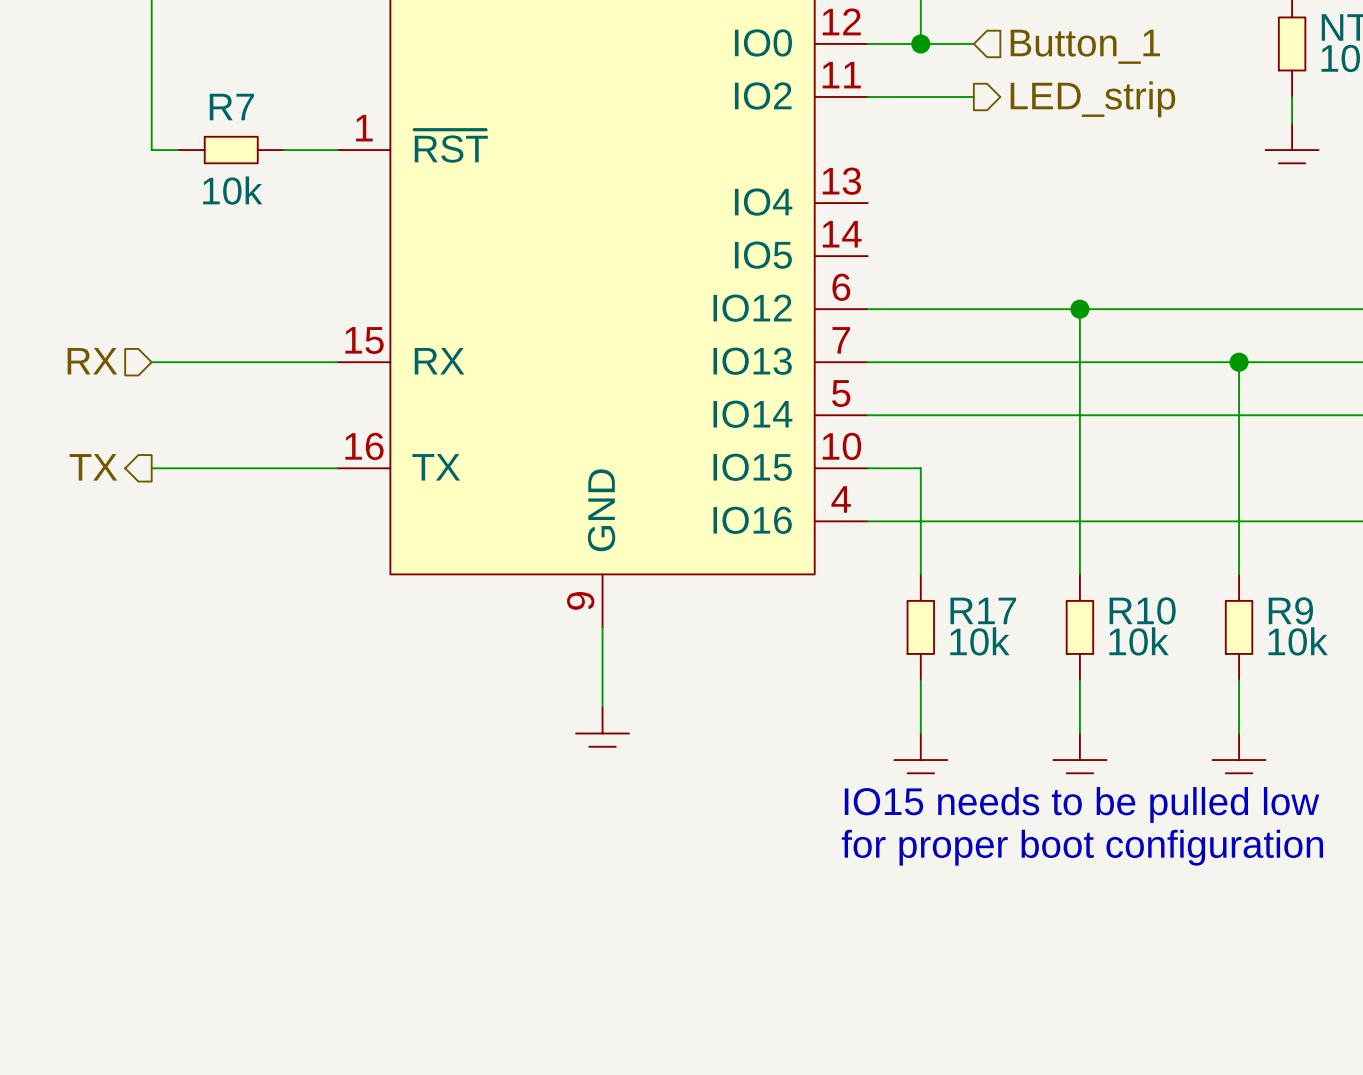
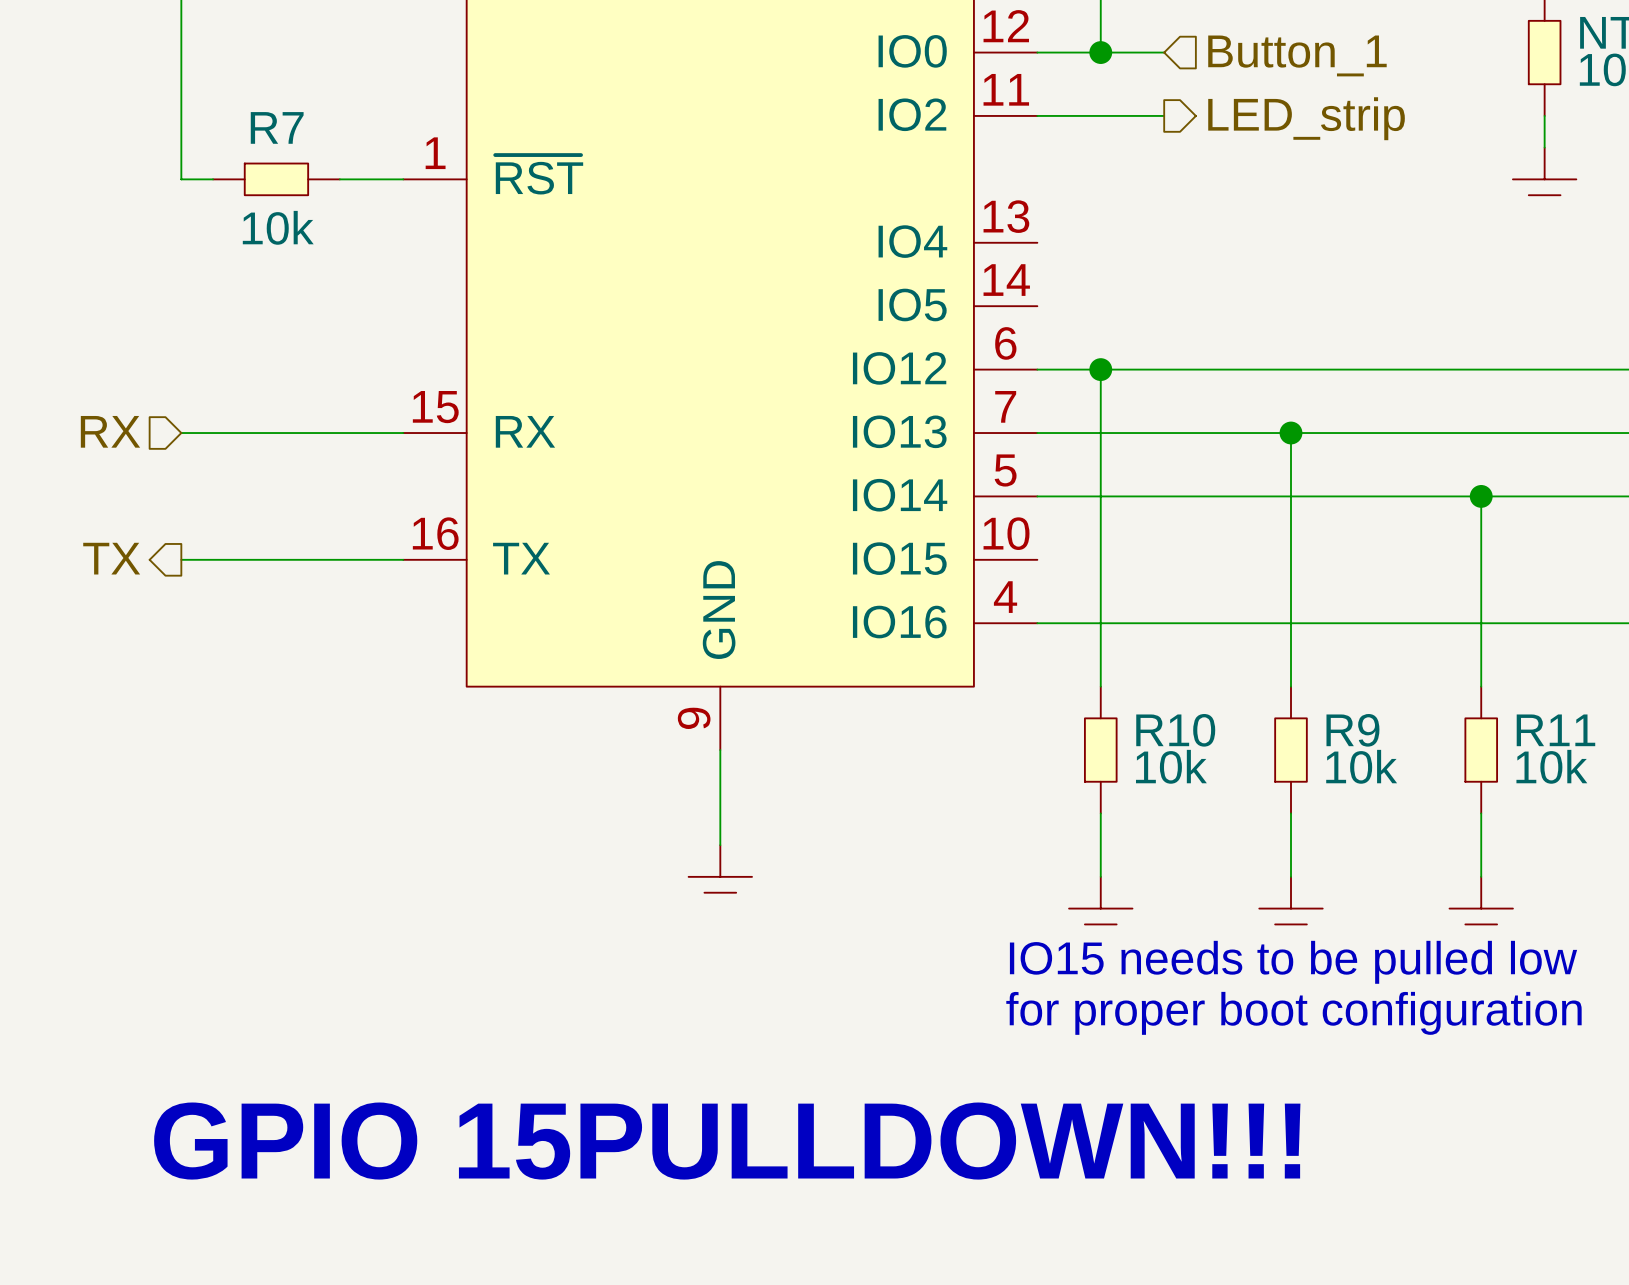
junction: none -> (1100, 369)
wire: (1079, 309) (1079, 362) -> none
junction position: (1079, 309) -> (1291, 433)
wire: (1239, 362) (1239, 415) -> none
junction position: (1239, 362) -> (1481, 496)
wire: (867, 468) (920, 468) -> (1100, 369) (1100, 559)
R17 name: R17 (983, 610) -> R10 (1175, 730)
R10 name: R10 (1142, 610) -> R9 (1352, 730)
R9 name: R9 (1290, 610) -> R11 (1555, 730)
text: none -> GPIO 15PULLDOWN!!! (727, 1141)

